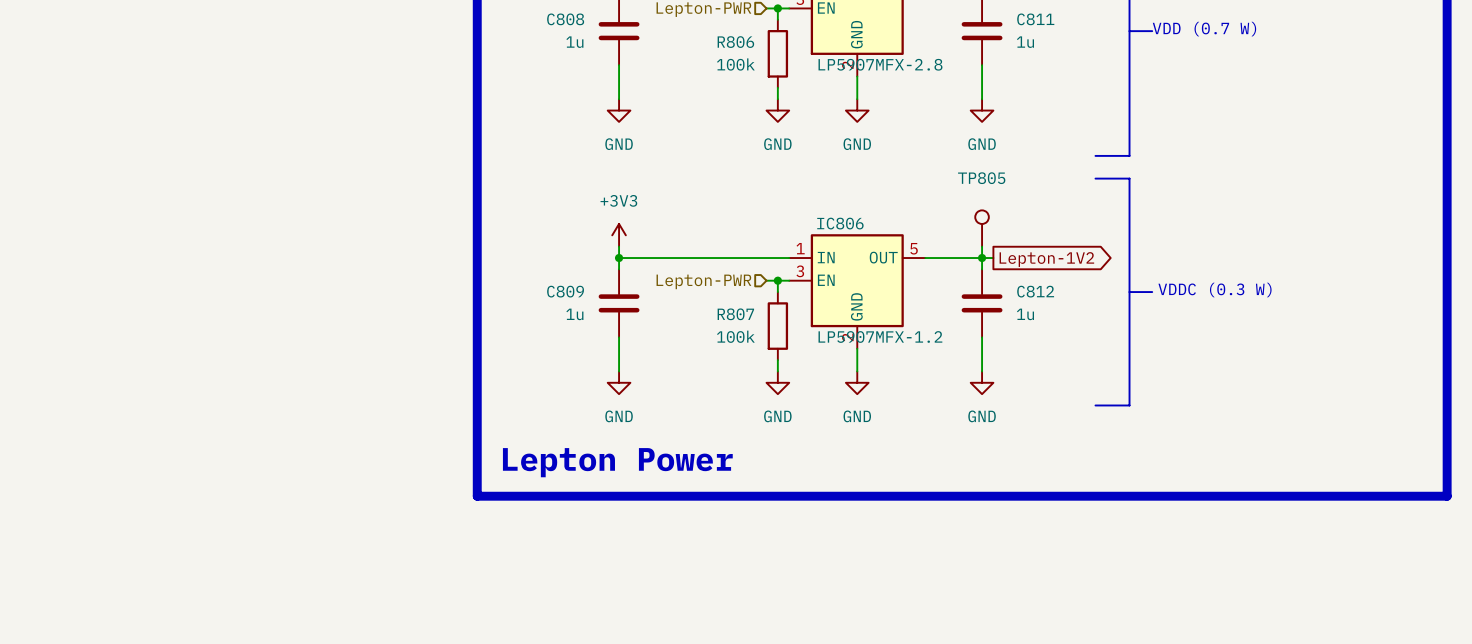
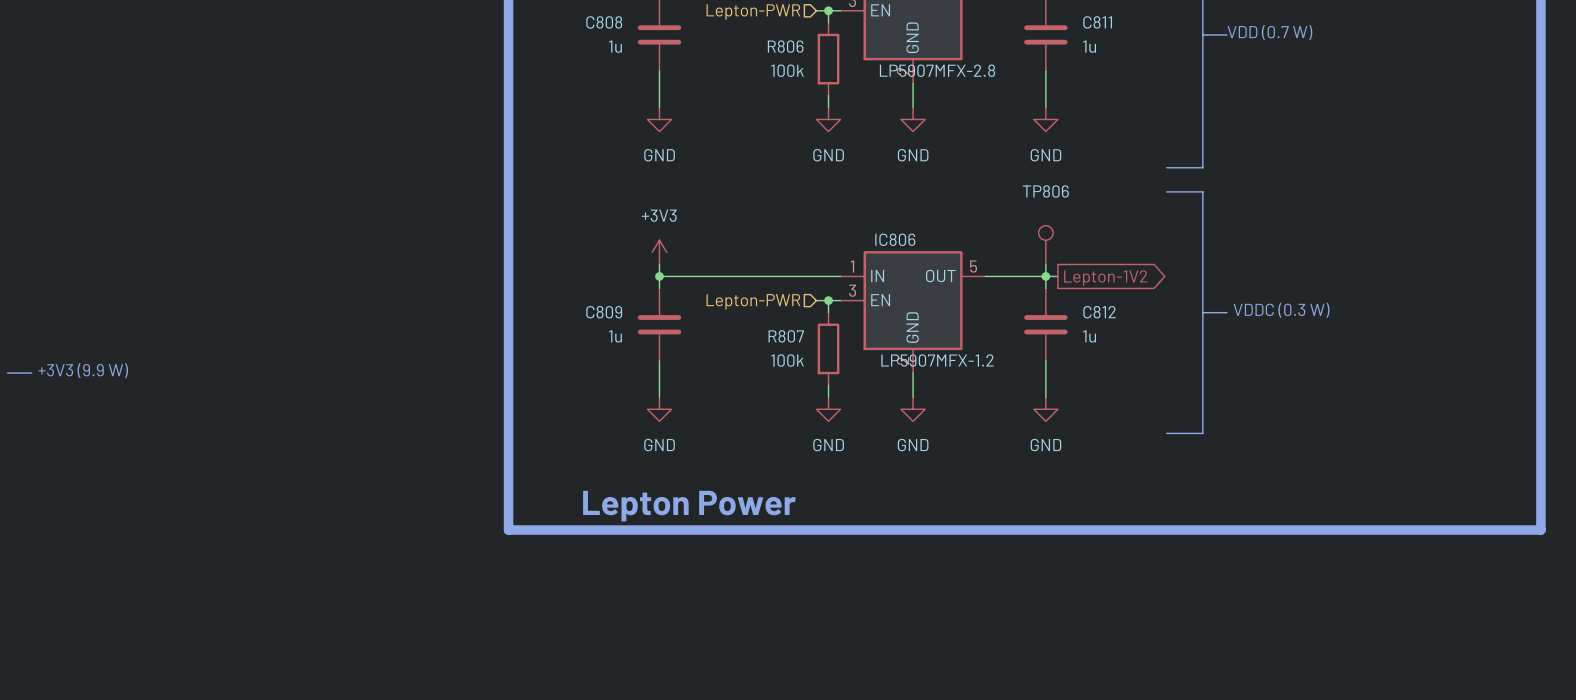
TP805 name: TP805 (981, 178) -> TP806 (1045, 191)
text: none -> +3V3 (9.9 W) (83, 370)
line: none -> (7, 373) (31, 373)
text position: Lepton Power (617, 462) -> Lepton Power (689, 506)

